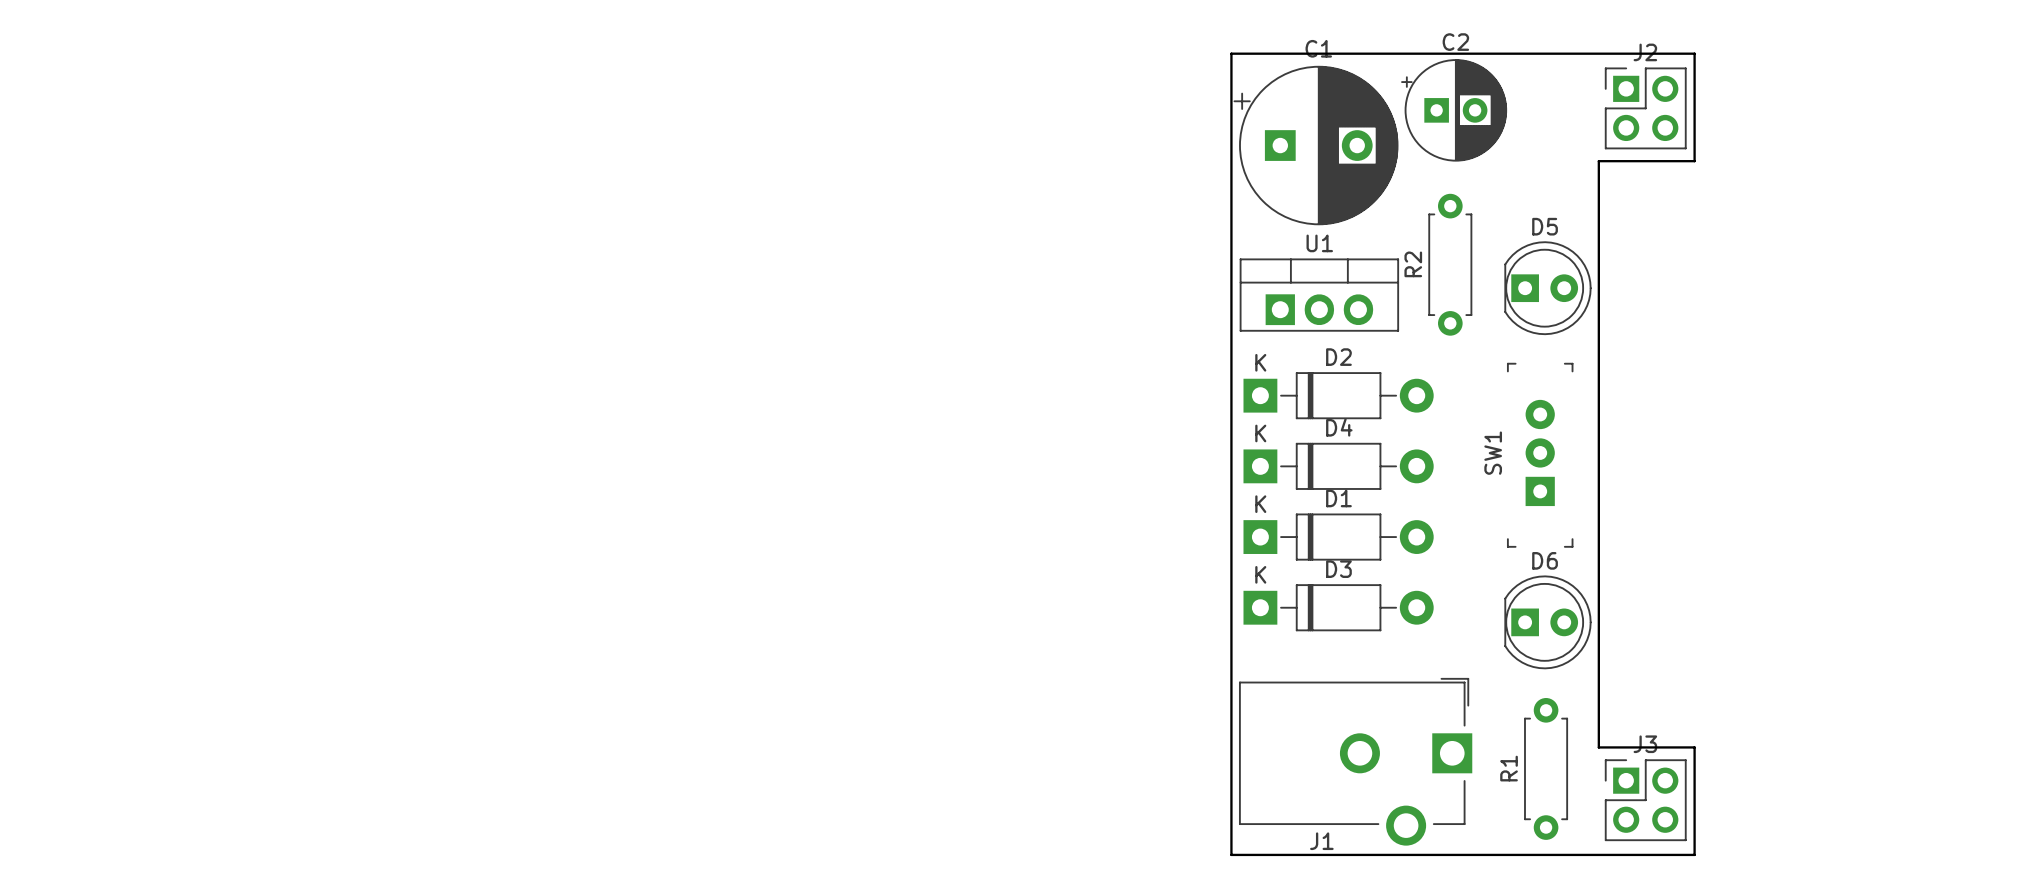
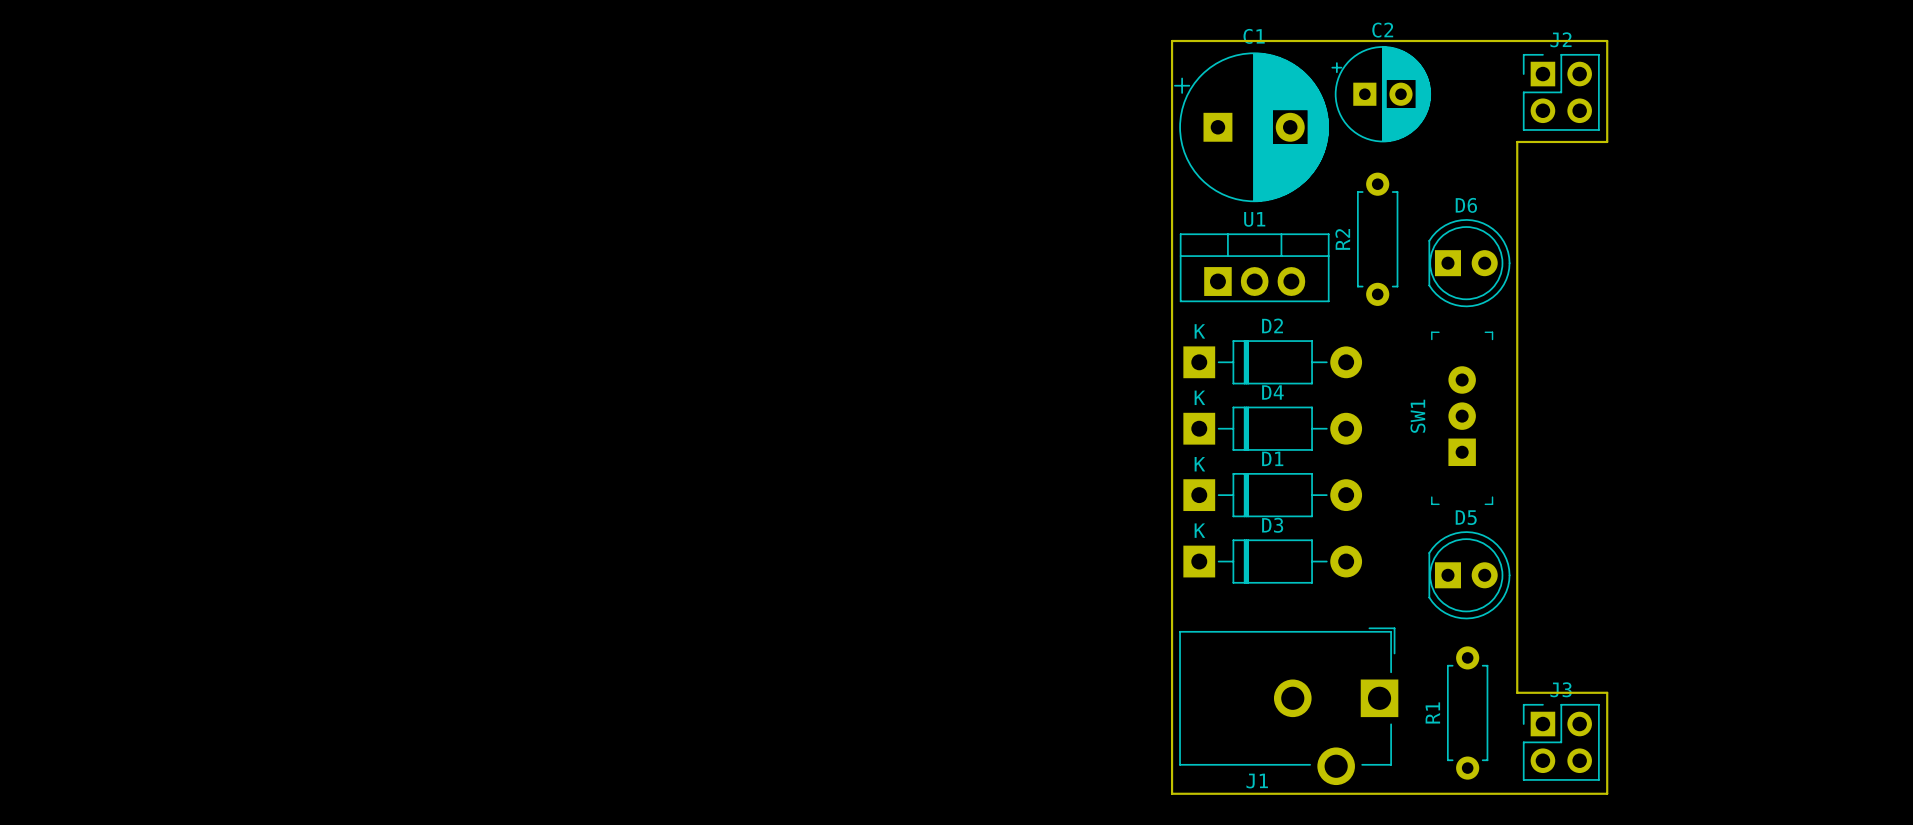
D5: (1547, 288) -> none
D6: none -> (1469, 263)
D6 name: D6 (1545, 560) -> D5 (1466, 517)

